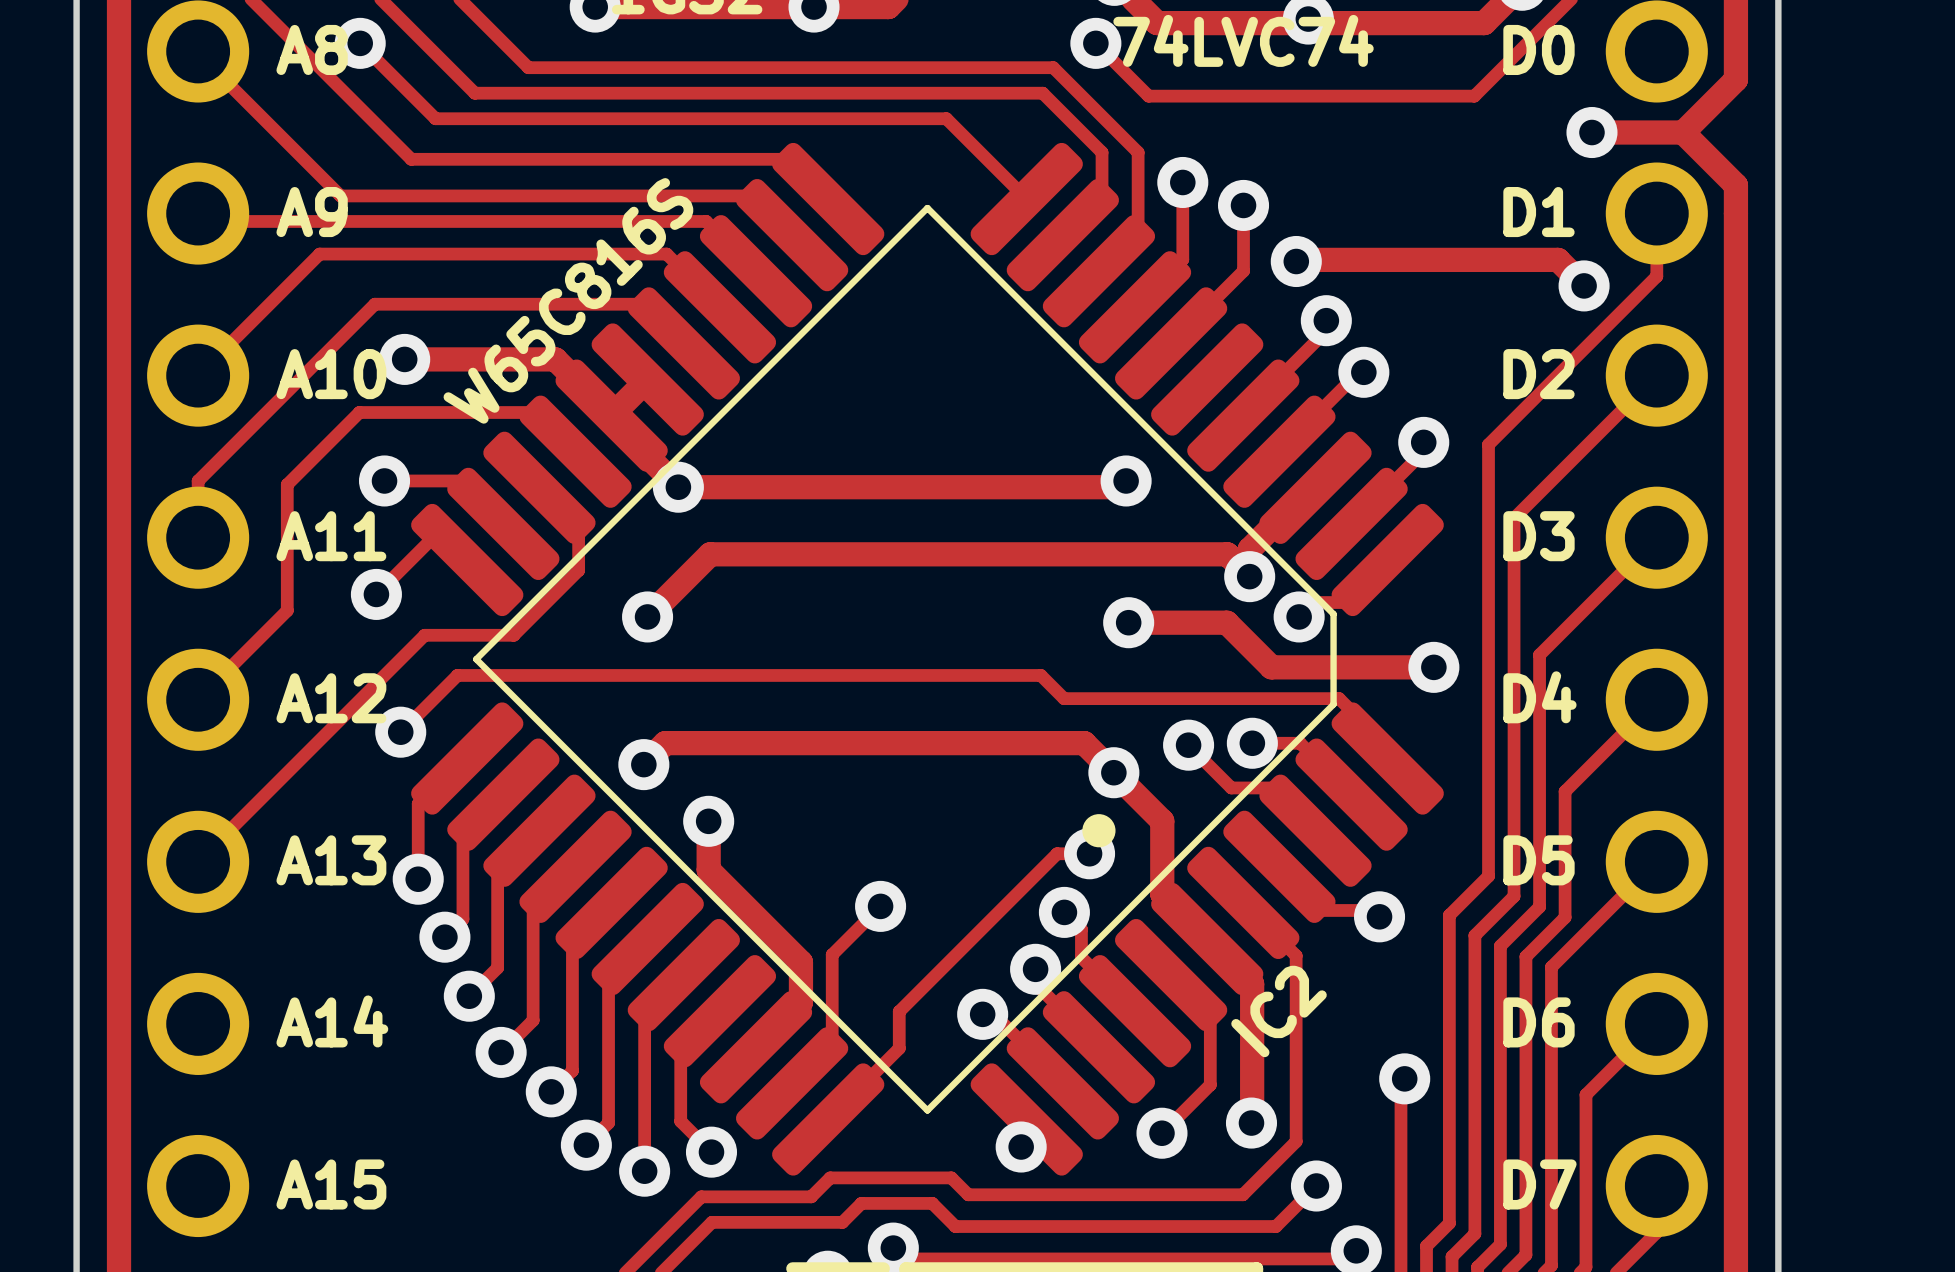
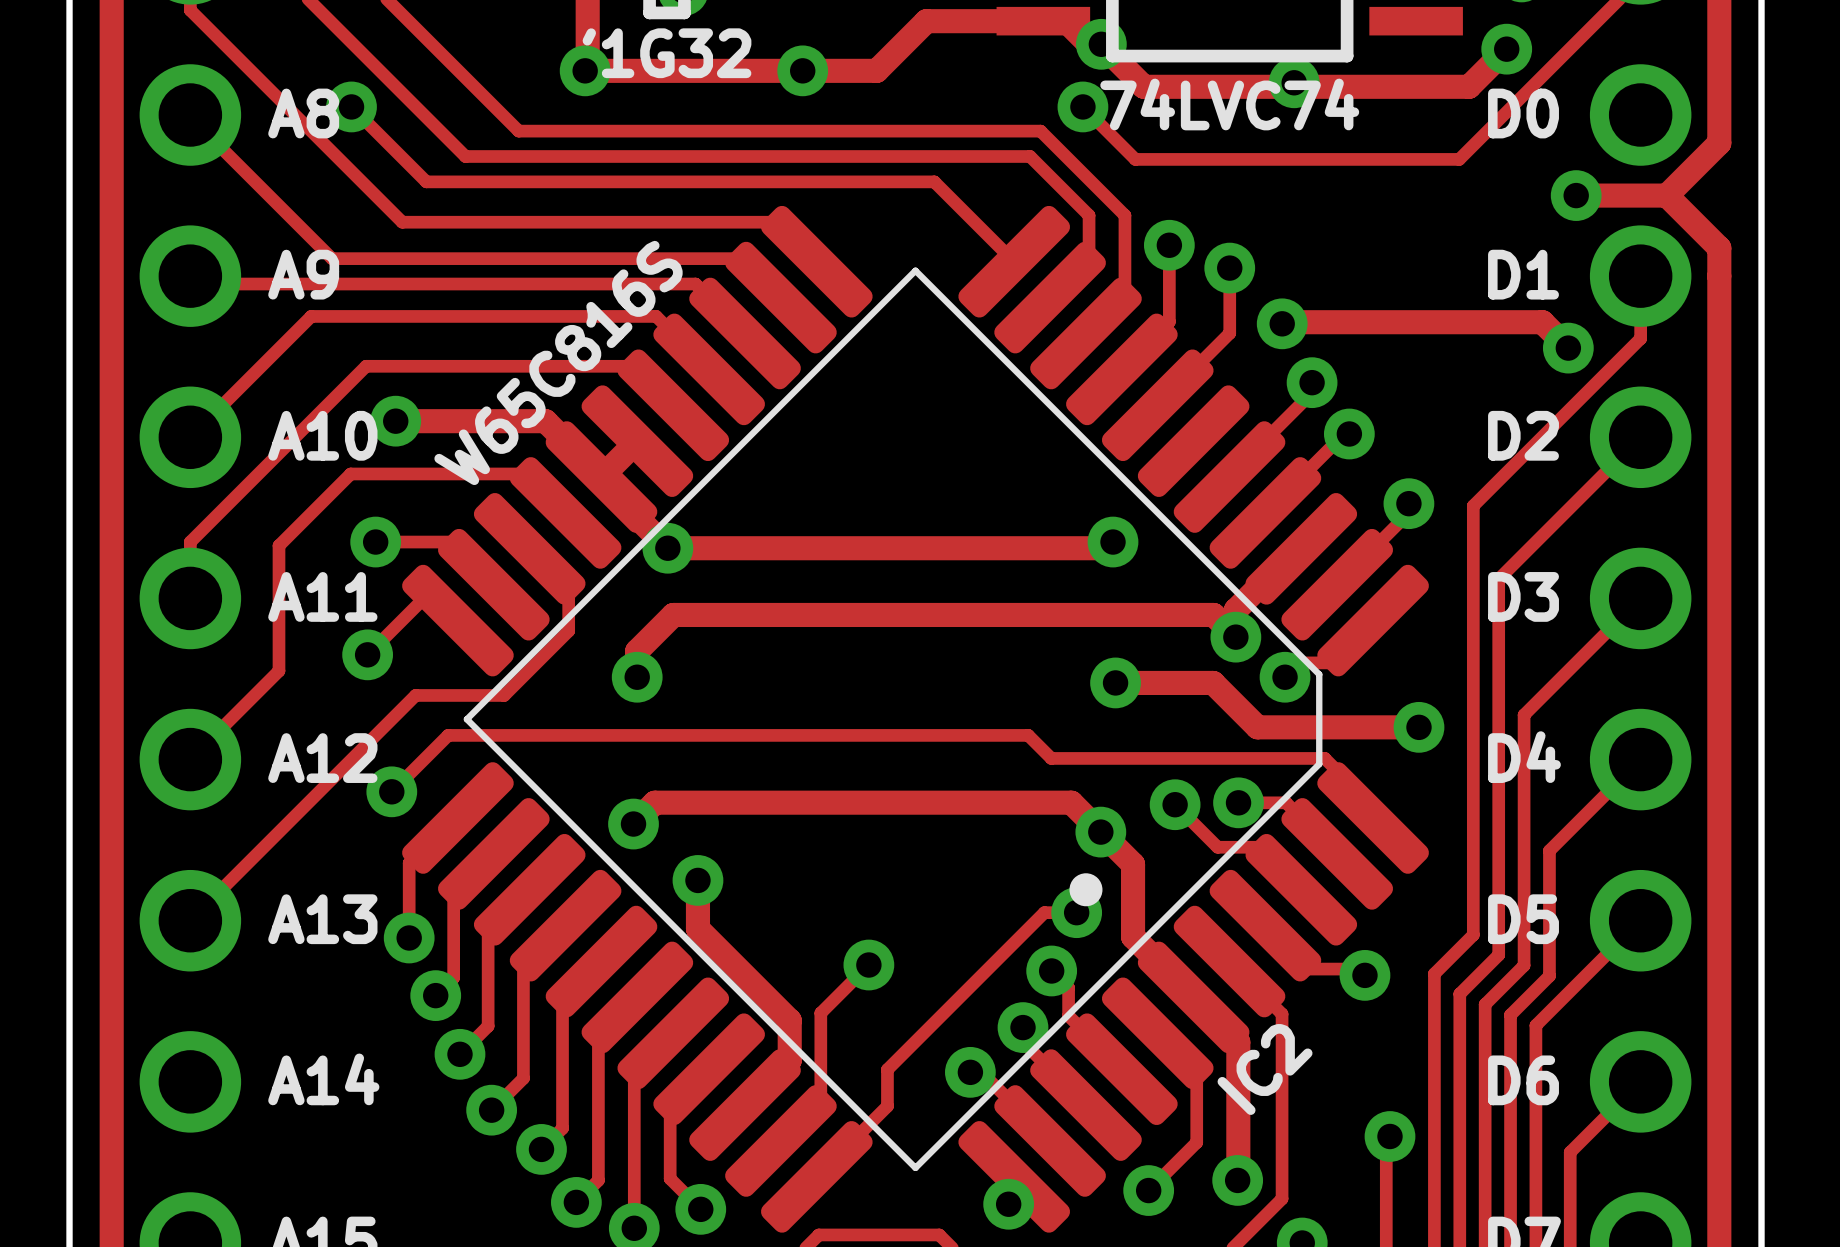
track: (710, 554) (647, 616) -> (699, 614) (673, 614) (637, 651) (637, 677)
track: (1146, 805) (1162, 821) (1162, 894) -> (1133, 864) (1133, 936) (1148, 952)

